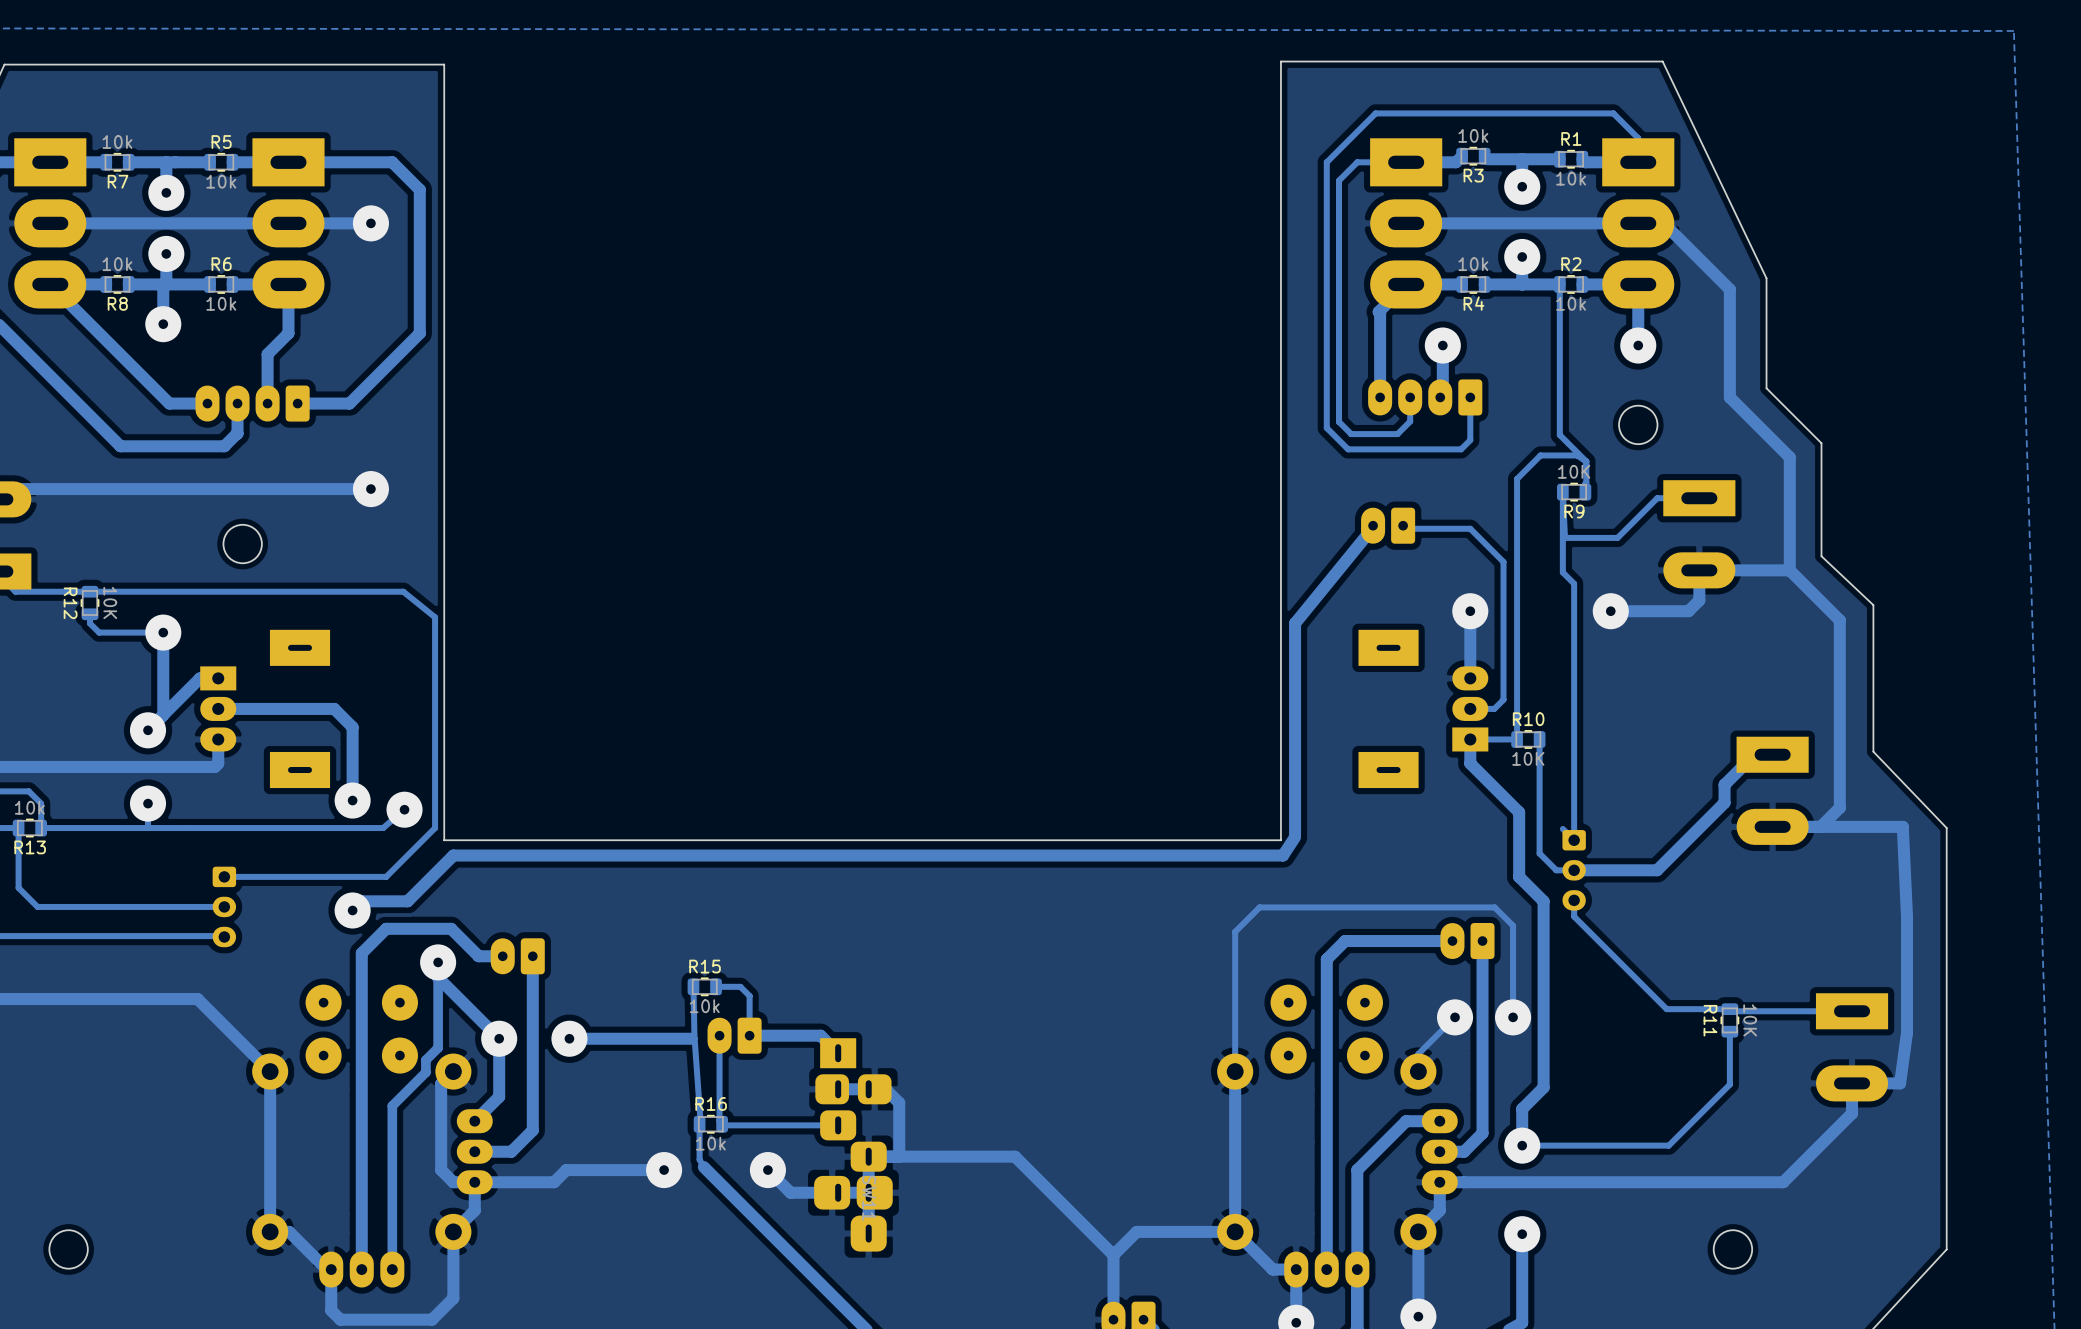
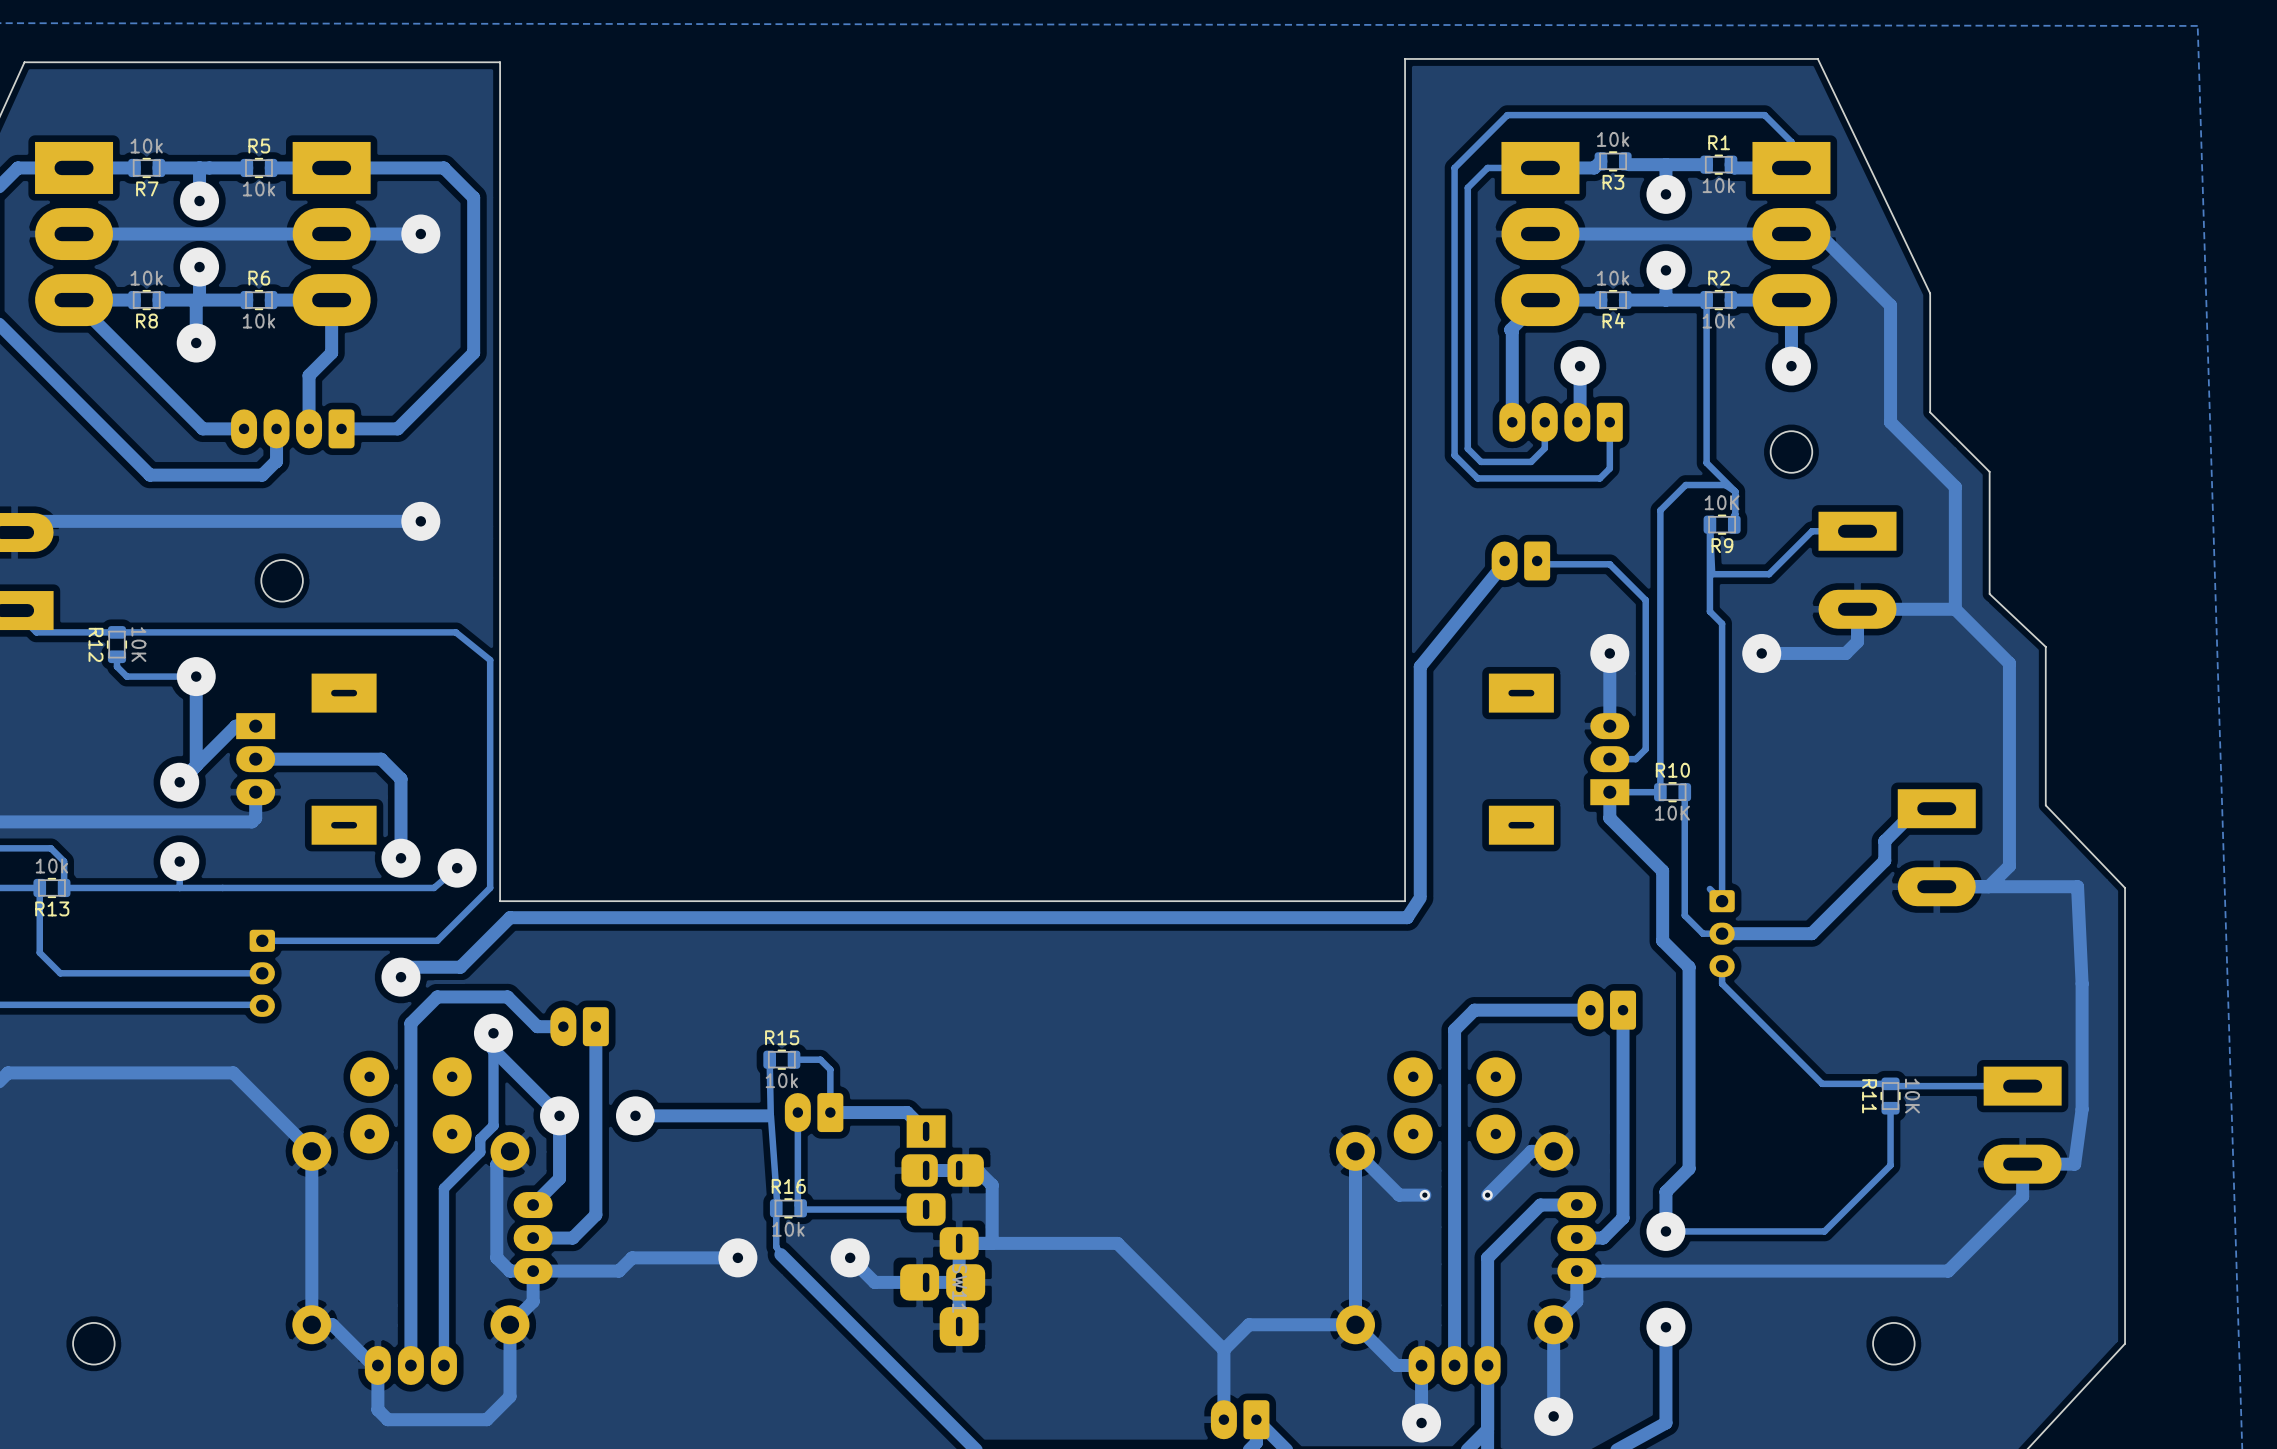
track: (1455, 1017) (1418, 1054) (1418, 1071) -> (1487, 1195) (1531, 1151) (1553, 1151)
via: (1455, 1017) -> none
track: (1513, 1017) (1513, 925) (1494, 907) (1259, 907) (1235, 931) (1235, 1071) -> (1424, 1195) (1399, 1195) (1355, 1151)
via: (1513, 1017) -> none
via: none -> (1424, 1195)
via: none -> (1487, 1195)

